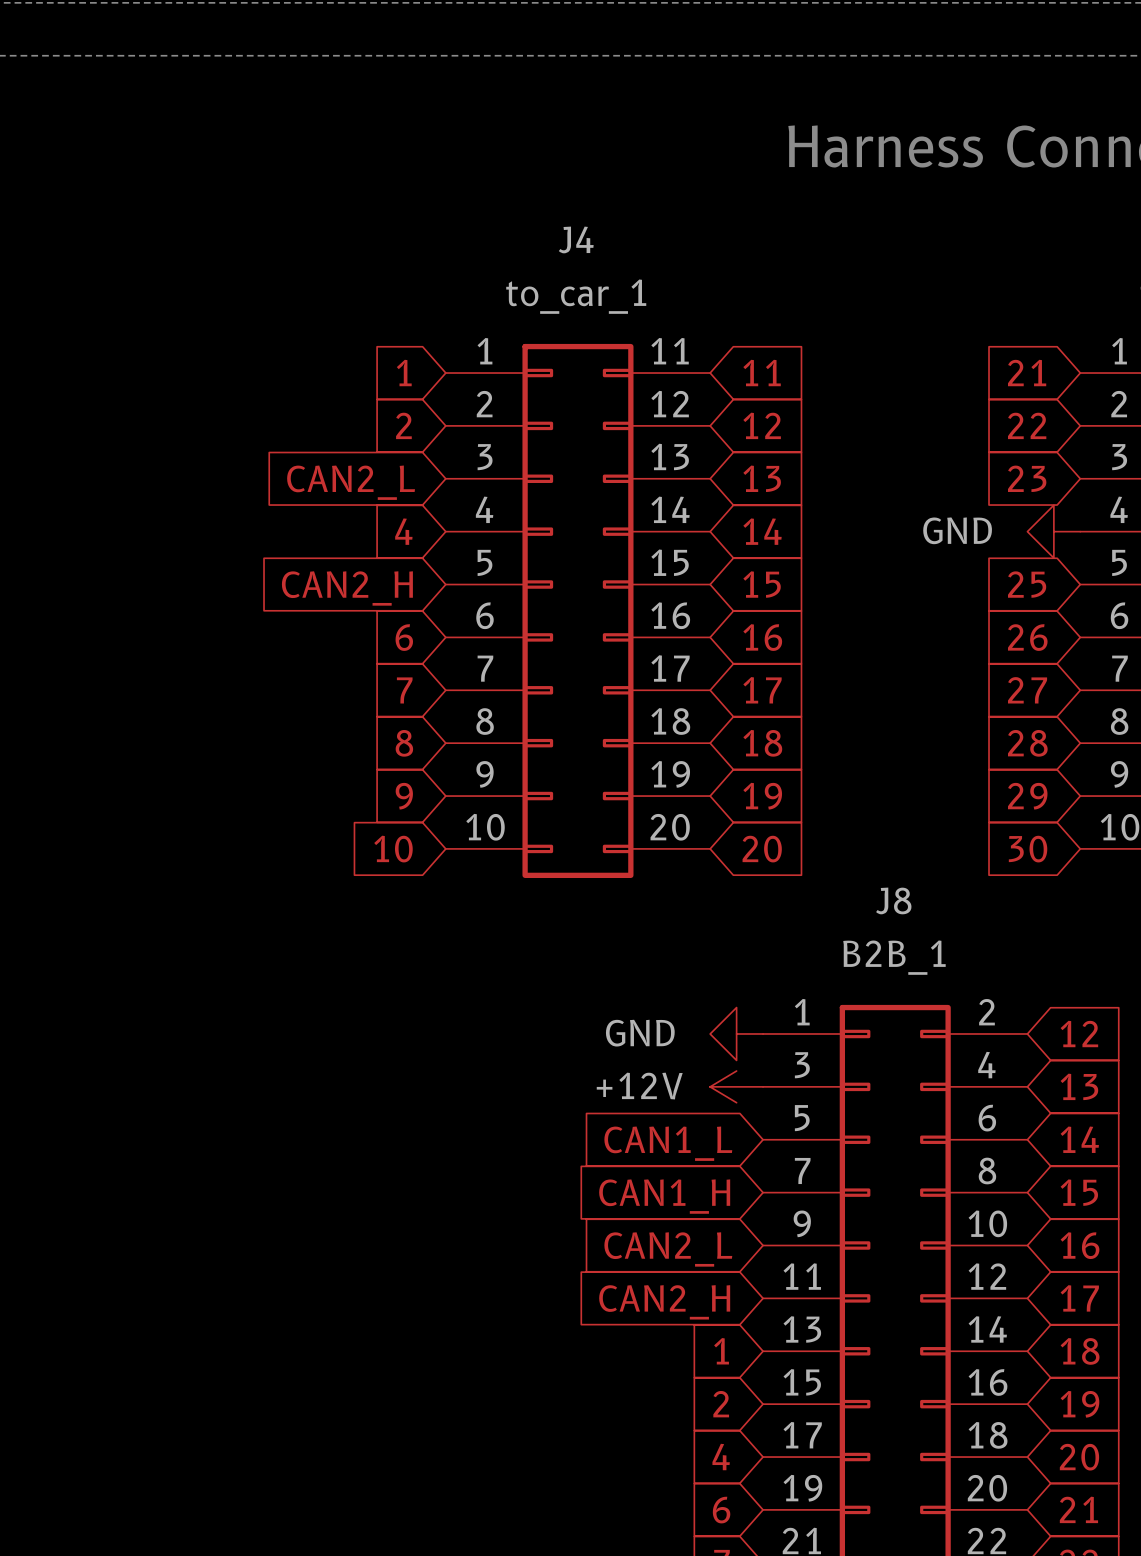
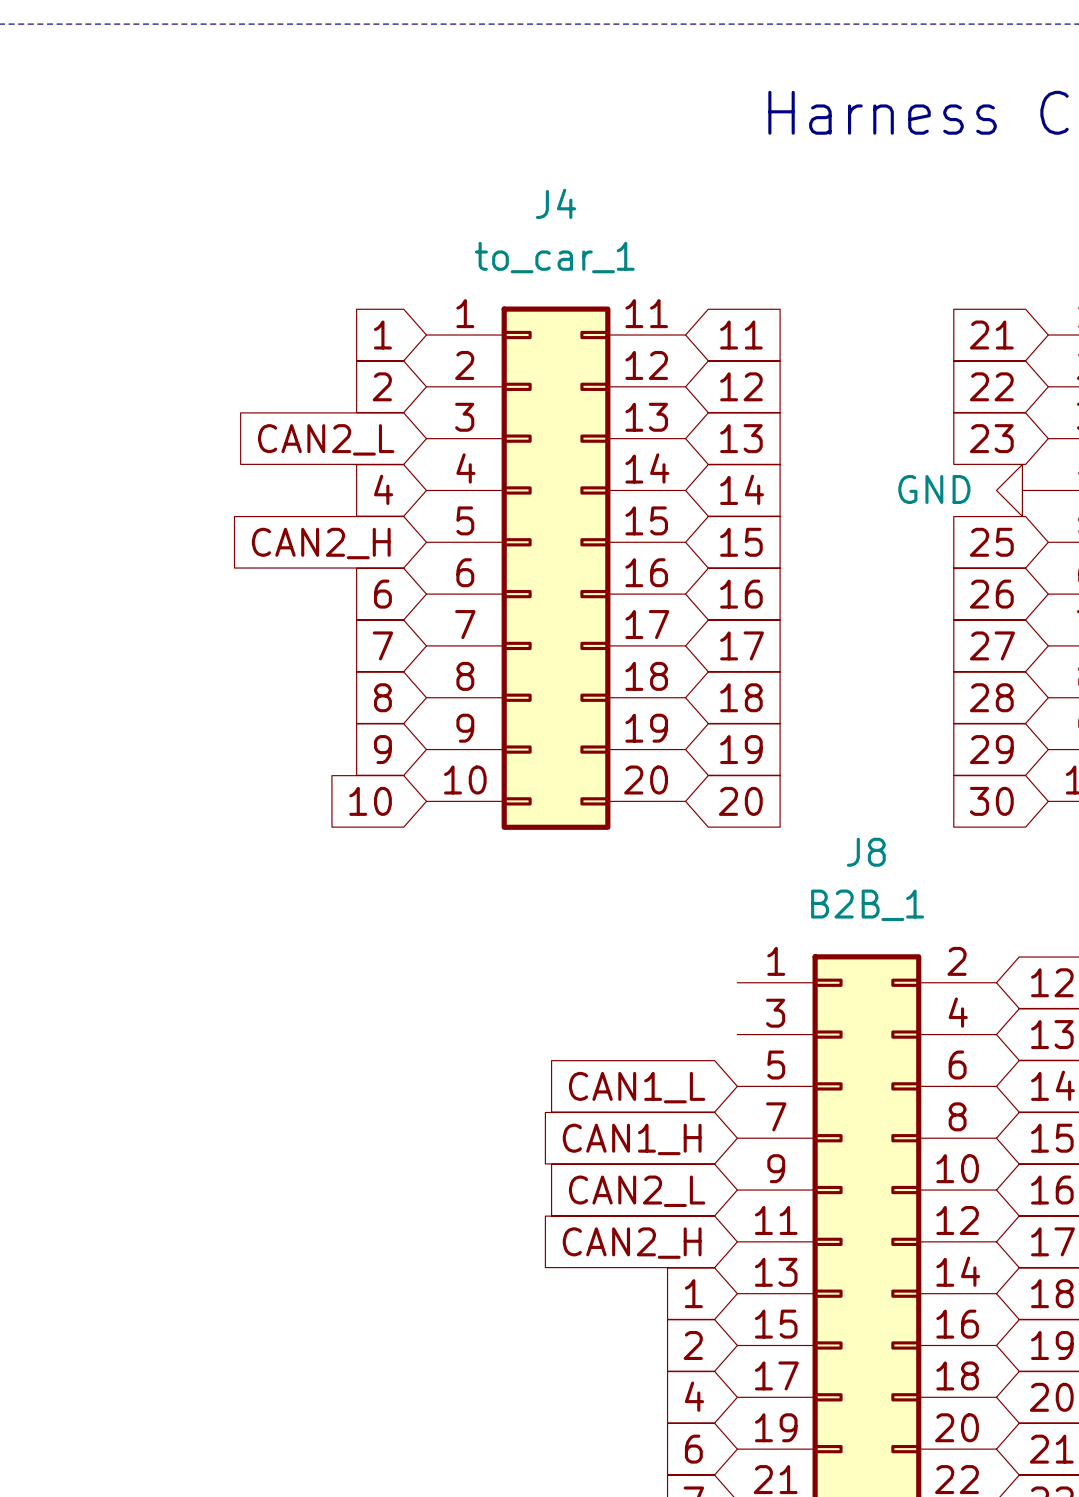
power symbol: GND (736, 1033) -> none
power symbol: +12V (736, 1086) -> none

